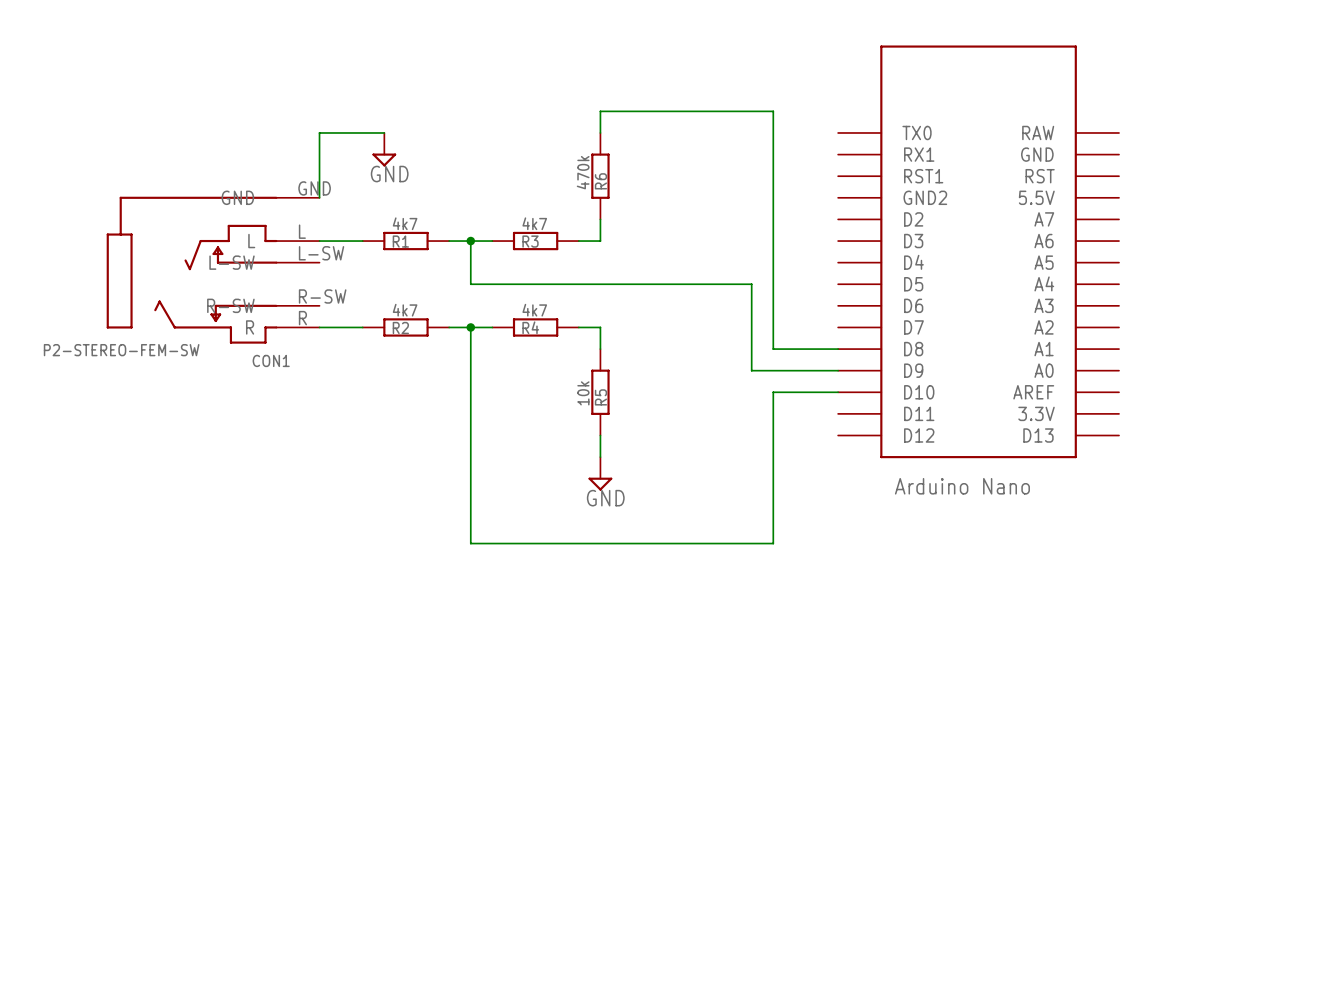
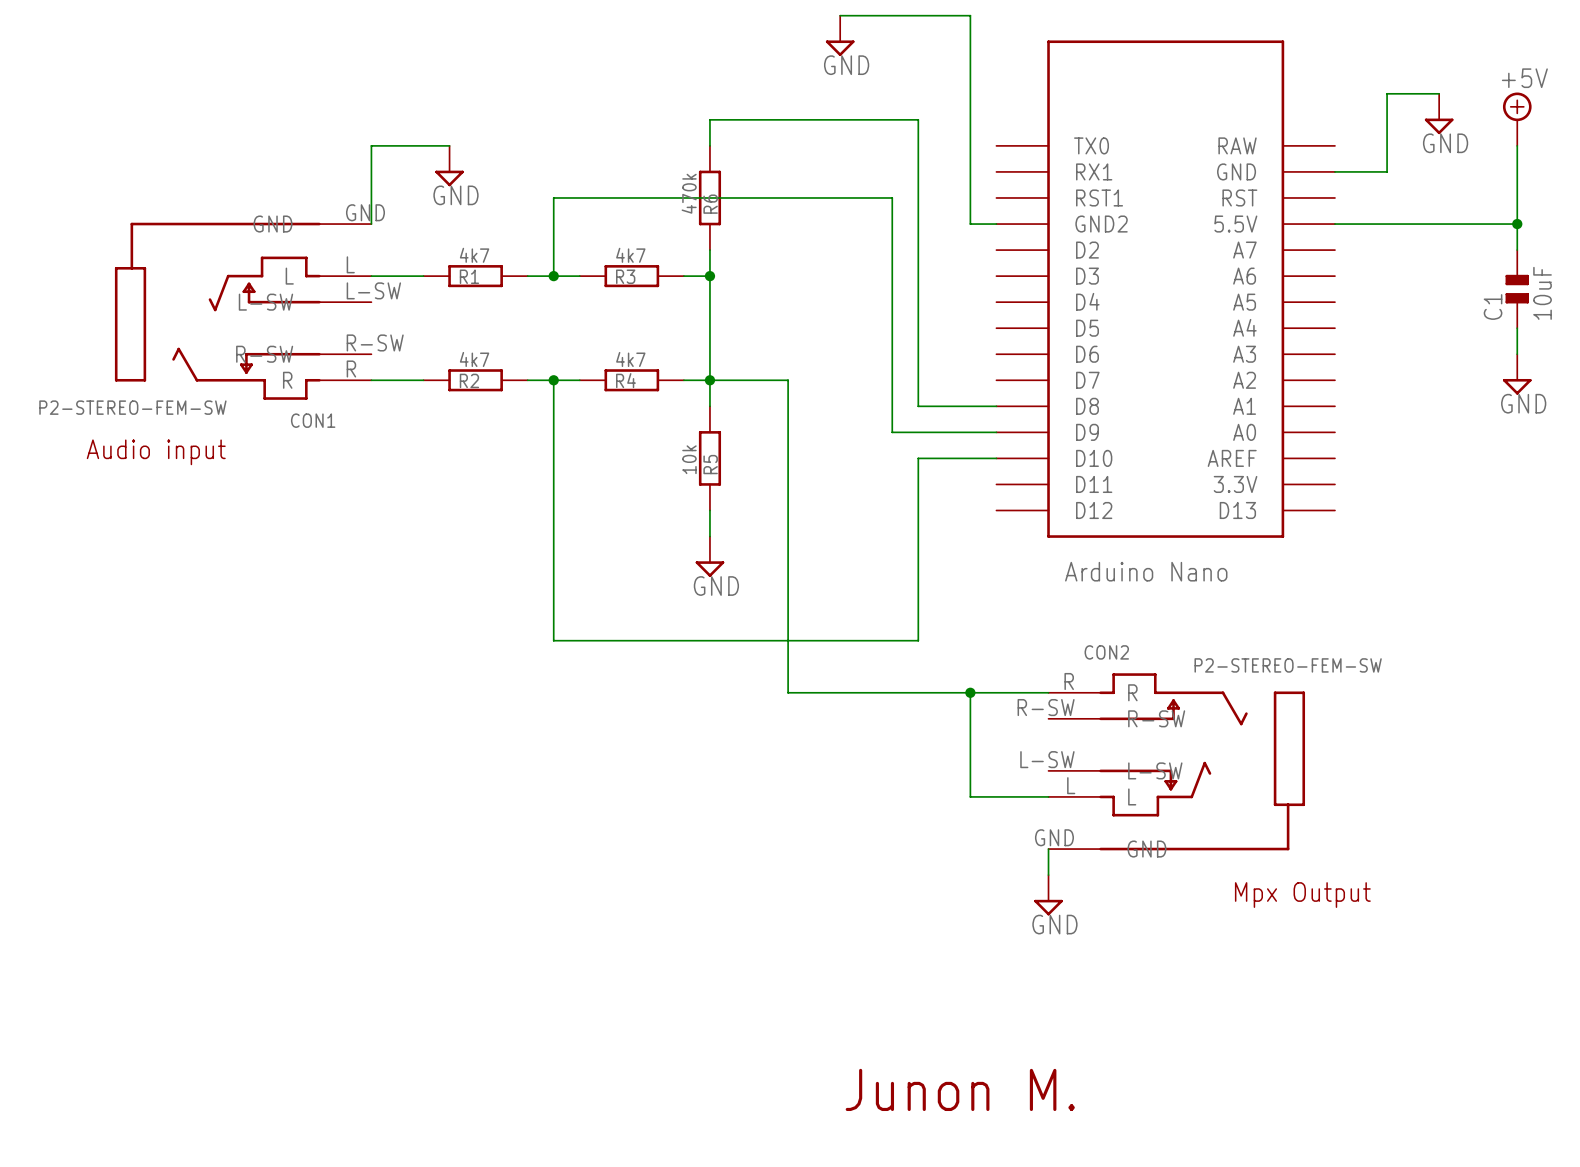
wire: none -> (840, 15) (970, 15) (970, 224) (996, 224)
power symbol: none -> GND (840, 35)
wire: none -> (1439, 93) (1387, 93) (1387, 171) (1334, 171)
power symbol: none -> GND (1439, 114)
power symbol: none -> +5V (1517, 119)
wire: none -> (1517, 145) (1517, 250)
wire: none -> (1334, 224) (1517, 224)
junction: none -> (1517, 224)
wire: (470, 241) (470, 284) (751, 284) -> (553, 276) (553, 197) (892, 197) (892, 328)
wire: none -> (709, 276) (709, 380) (788, 380) (788, 692) (1048, 692)
junction: none -> (709, 276)
C1: none -> 10uF (1517, 289)
wire: none -> (1517, 328) (1517, 354)
power symbol: none -> GND (1517, 374)
junction: none -> (709, 380)
text: none -> Audio input (156, 452)
wire: none -> (970, 692) (970, 796) (1048, 796)
junction: none -> (970, 692)
CON2: none -> P2-STEREO-FEM-SW (1176, 761)
wire: none -> (1048, 849) (1048, 875)
power symbol: none -> GND (1048, 895)
text: none -> Mpx Output (1302, 895)
text: none -> Junon M. (960, 1089)

